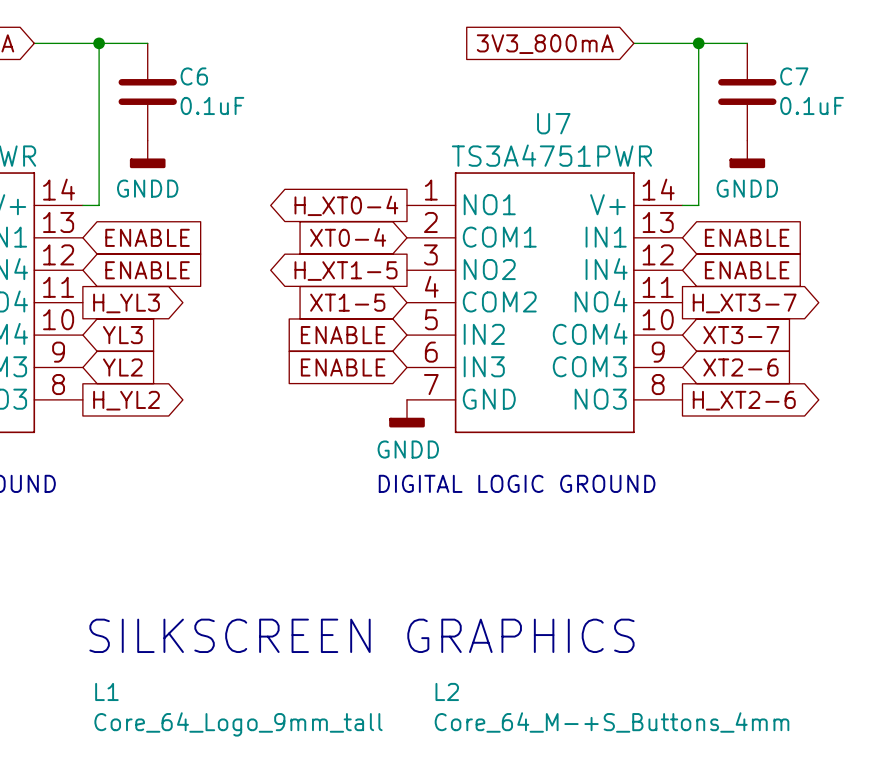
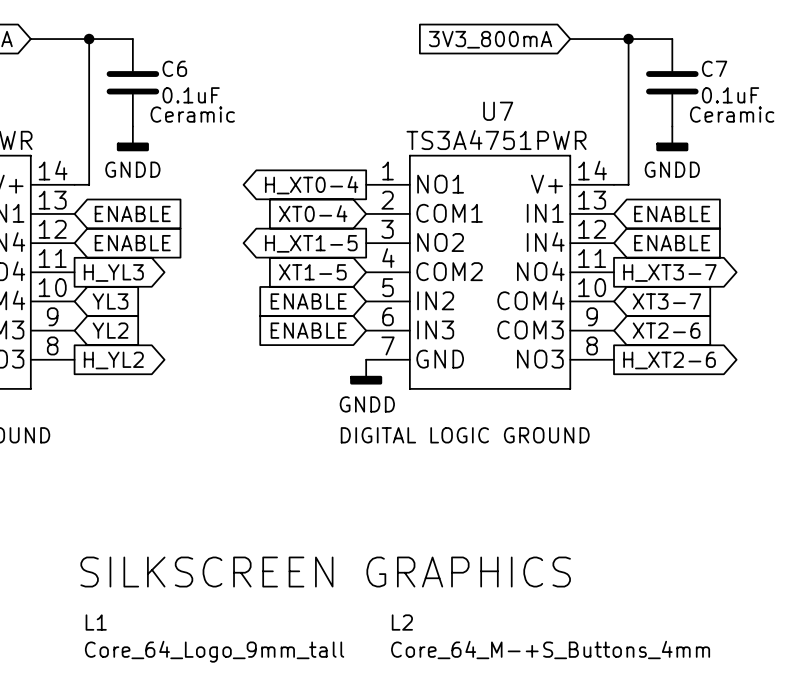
text: none -> Ceramic (192, 114)
text: none -> Ceramic (732, 114)

